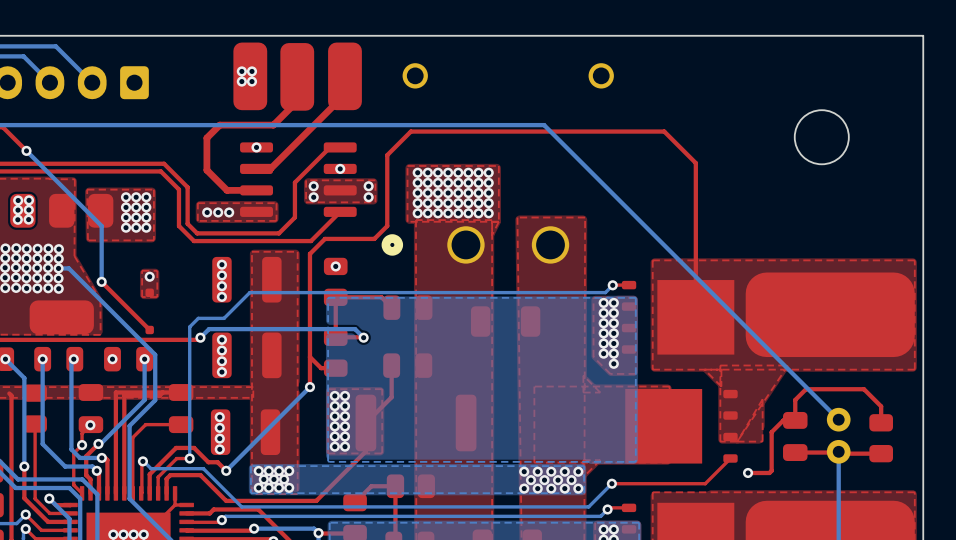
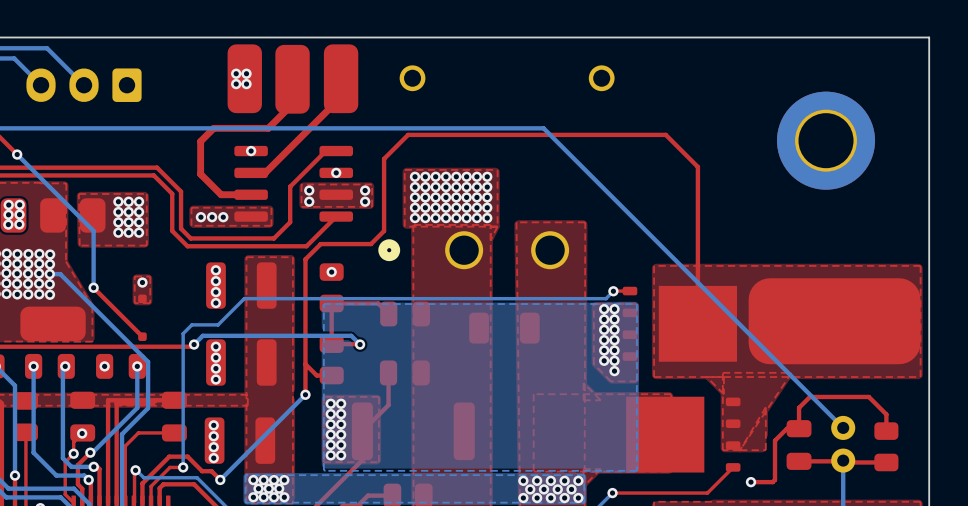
round board edge: [794, 109, 850, 165] -> none
part: none -> (826, 140)

